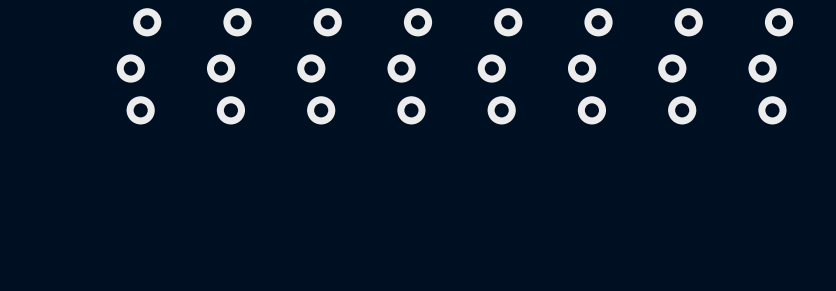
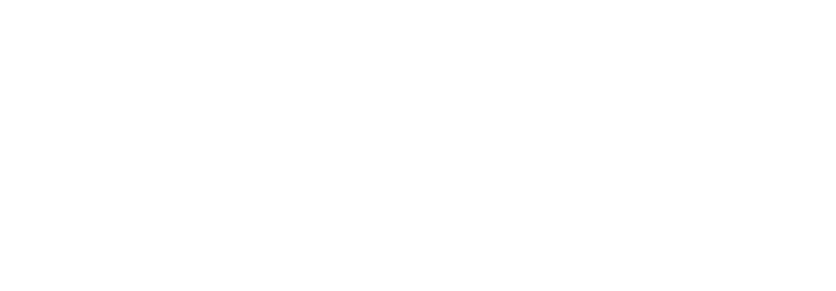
via: (147, 22) -> none
via: (237, 22) -> none
via: (327, 22) -> none
via: (418, 22) -> none
via: (508, 22) -> none
via: (598, 22) -> none
via: (688, 22) -> none
via: (779, 22) -> none
via: (130, 68) -> none
via: (221, 68) -> none
via: (311, 68) -> none
via: (401, 68) -> none
via: (491, 68) -> none
via: (582, 68) -> none
via: (672, 68) -> none
via: (762, 68) -> none
via: (140, 110) -> none
via: (230, 110) -> none
via: (321, 110) -> none
via: (411, 110) -> none
via: (501, 110) -> none
via: (591, 110) -> none
via: (682, 110) -> none
via: (772, 110) -> none

